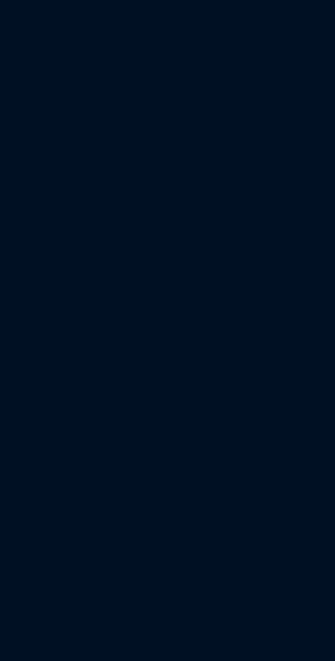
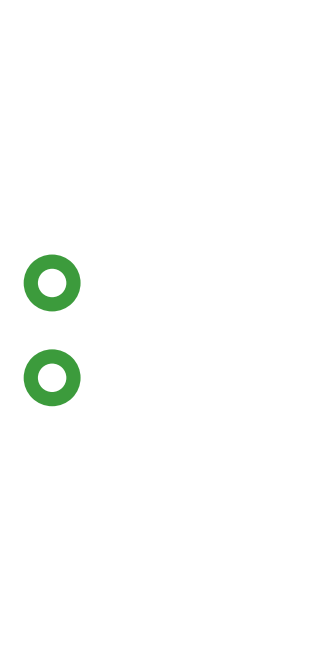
part: none -> (52, 330)

